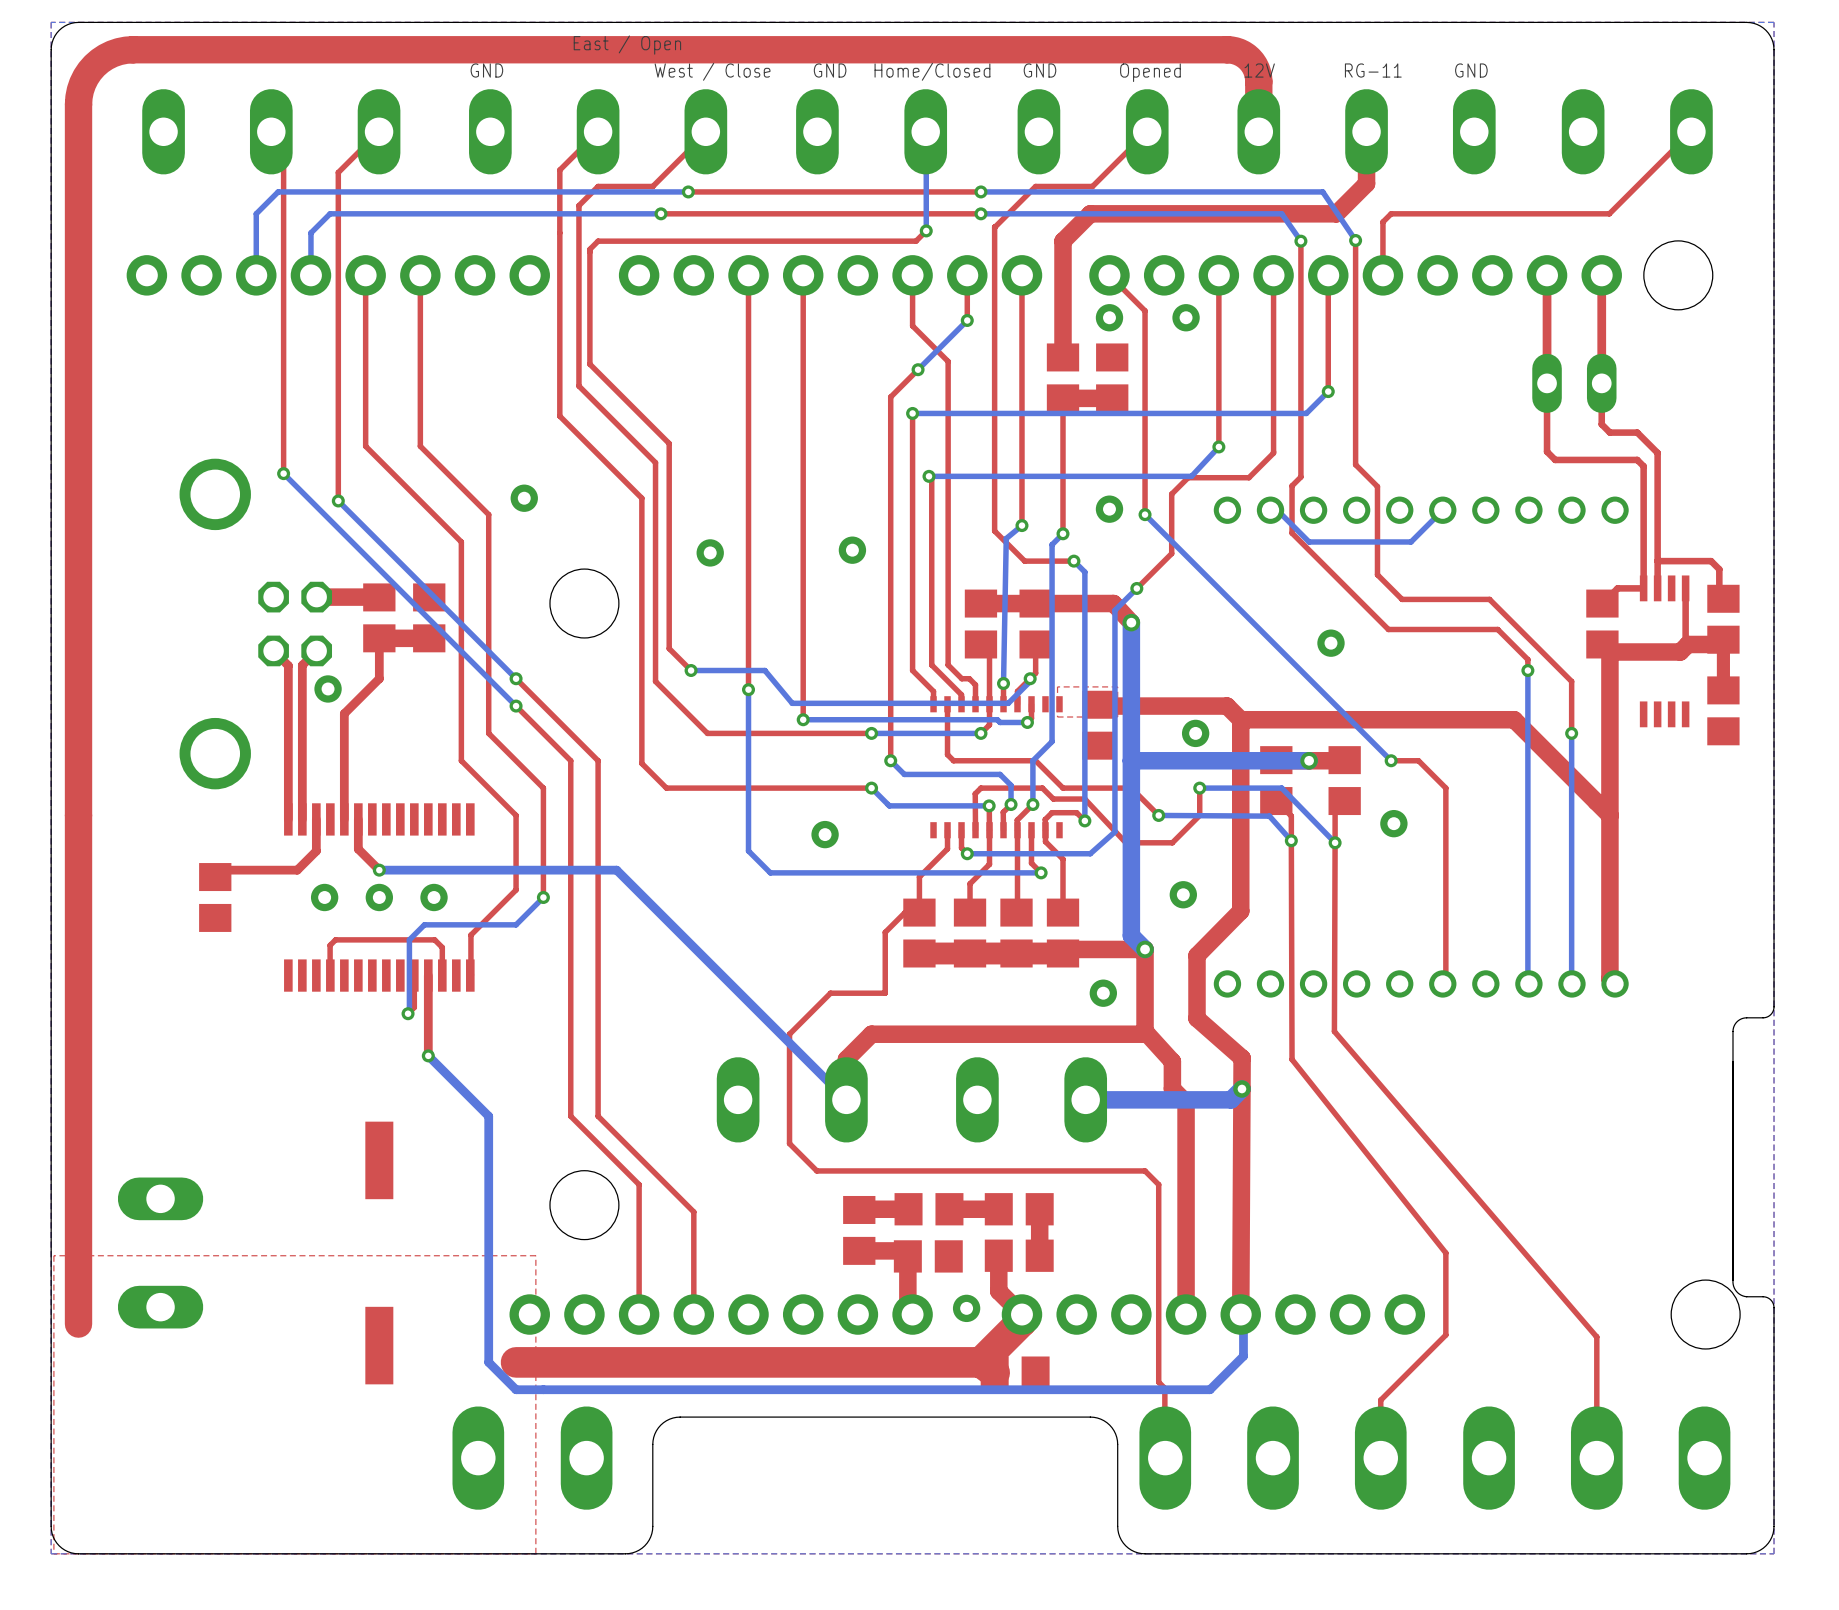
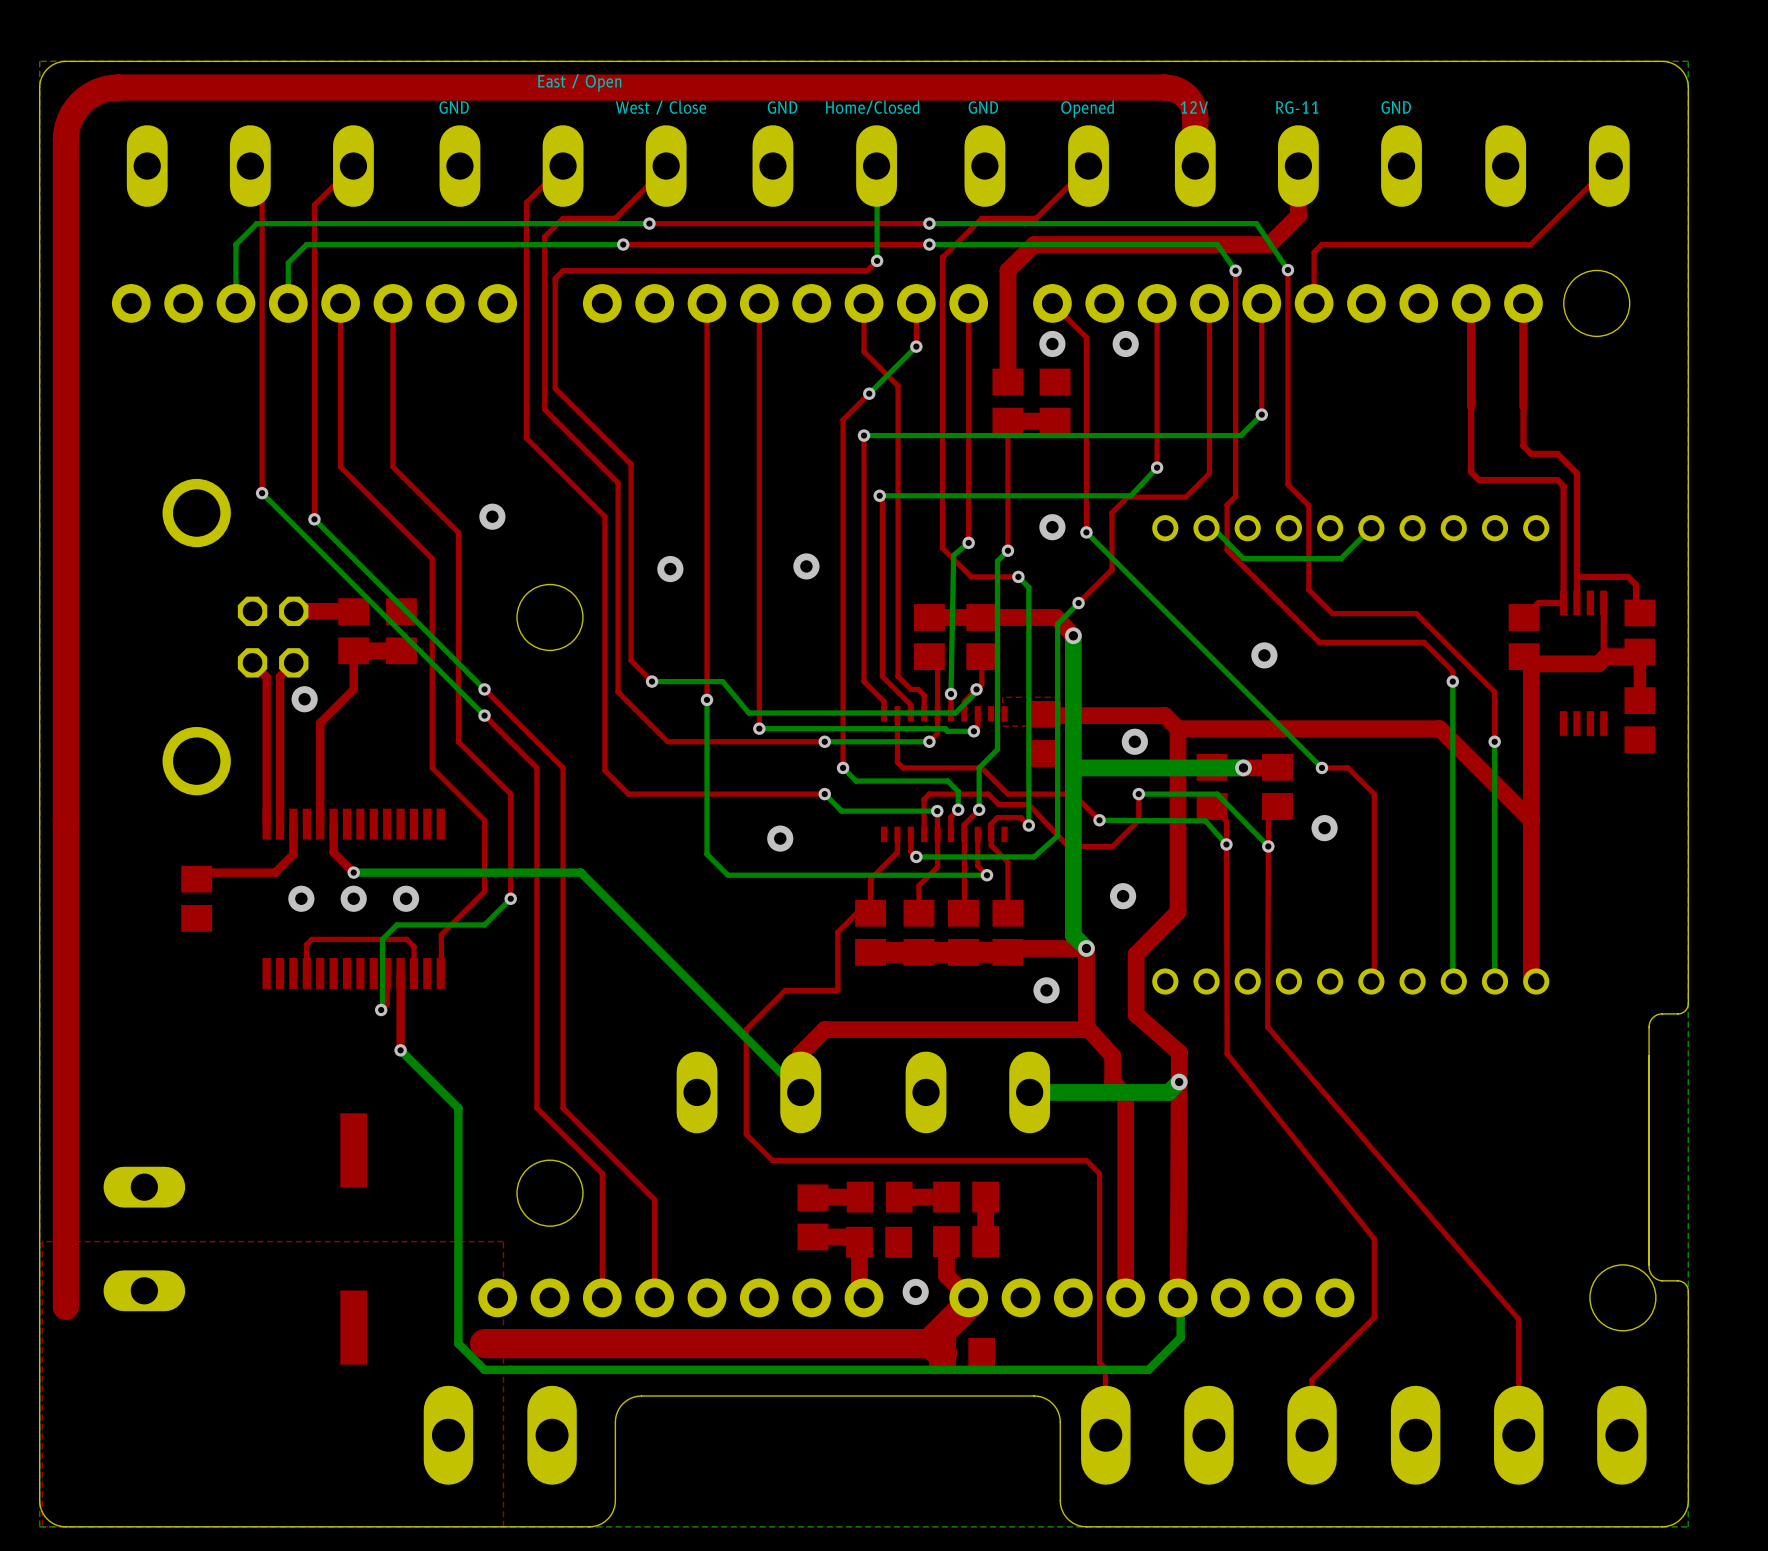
part: (1574, 383) -> none

